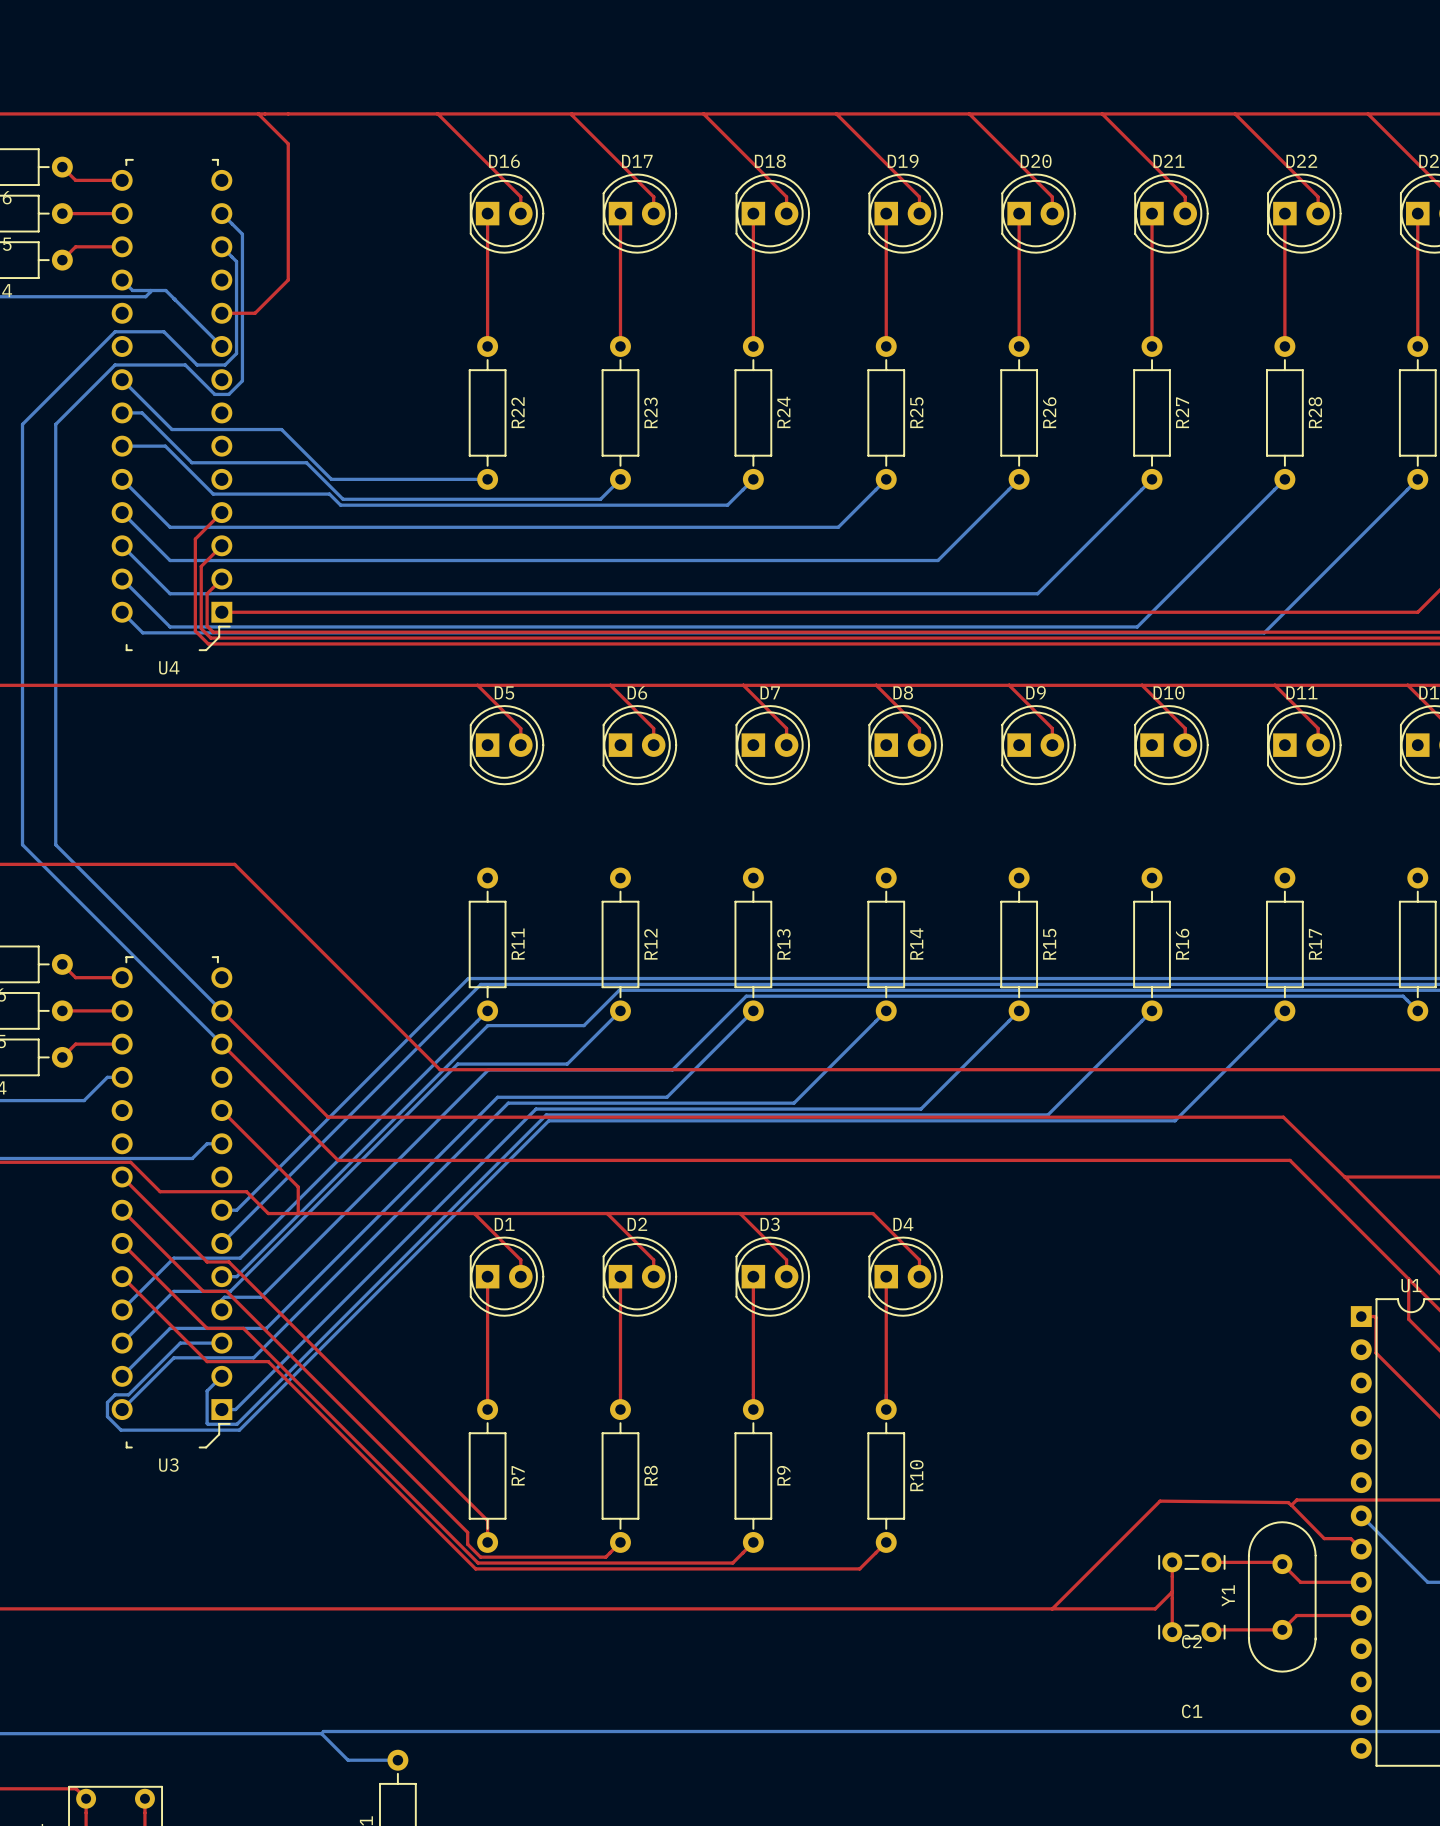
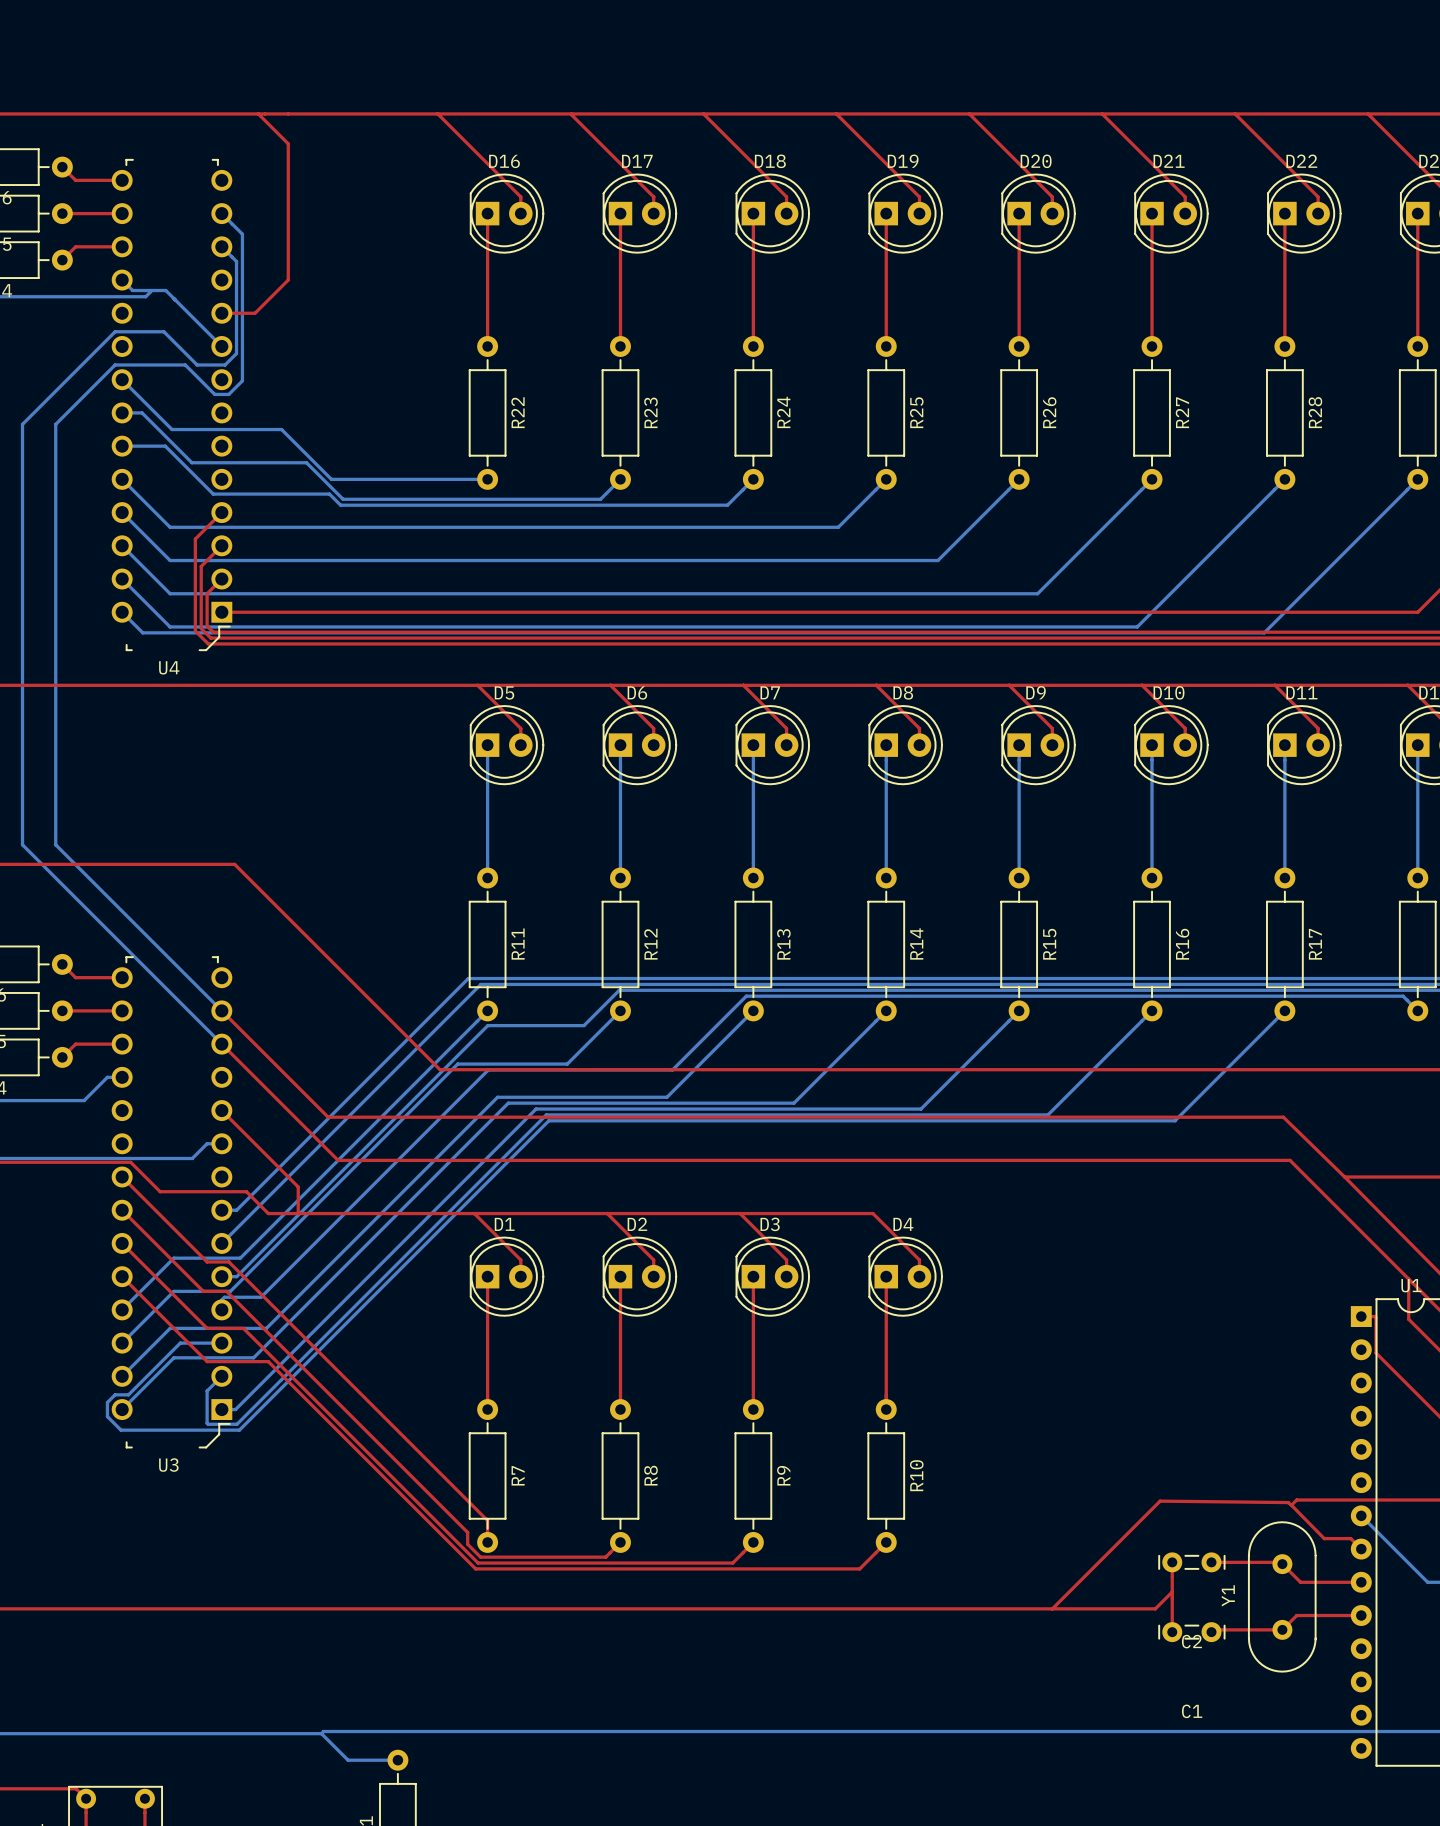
bottom track: none -> (487, 745) (487, 878)
bottom track: none -> (620, 745) (620, 878)
bottom track: none -> (753, 745) (753, 878)
bottom track: none -> (886, 745) (886, 878)
bottom track: none -> (1019, 745) (1019, 878)
bottom track: none -> (1152, 745) (1152, 878)
bottom track: none -> (1284, 745) (1284, 878)
bottom track: none -> (1417, 745) (1417, 878)

